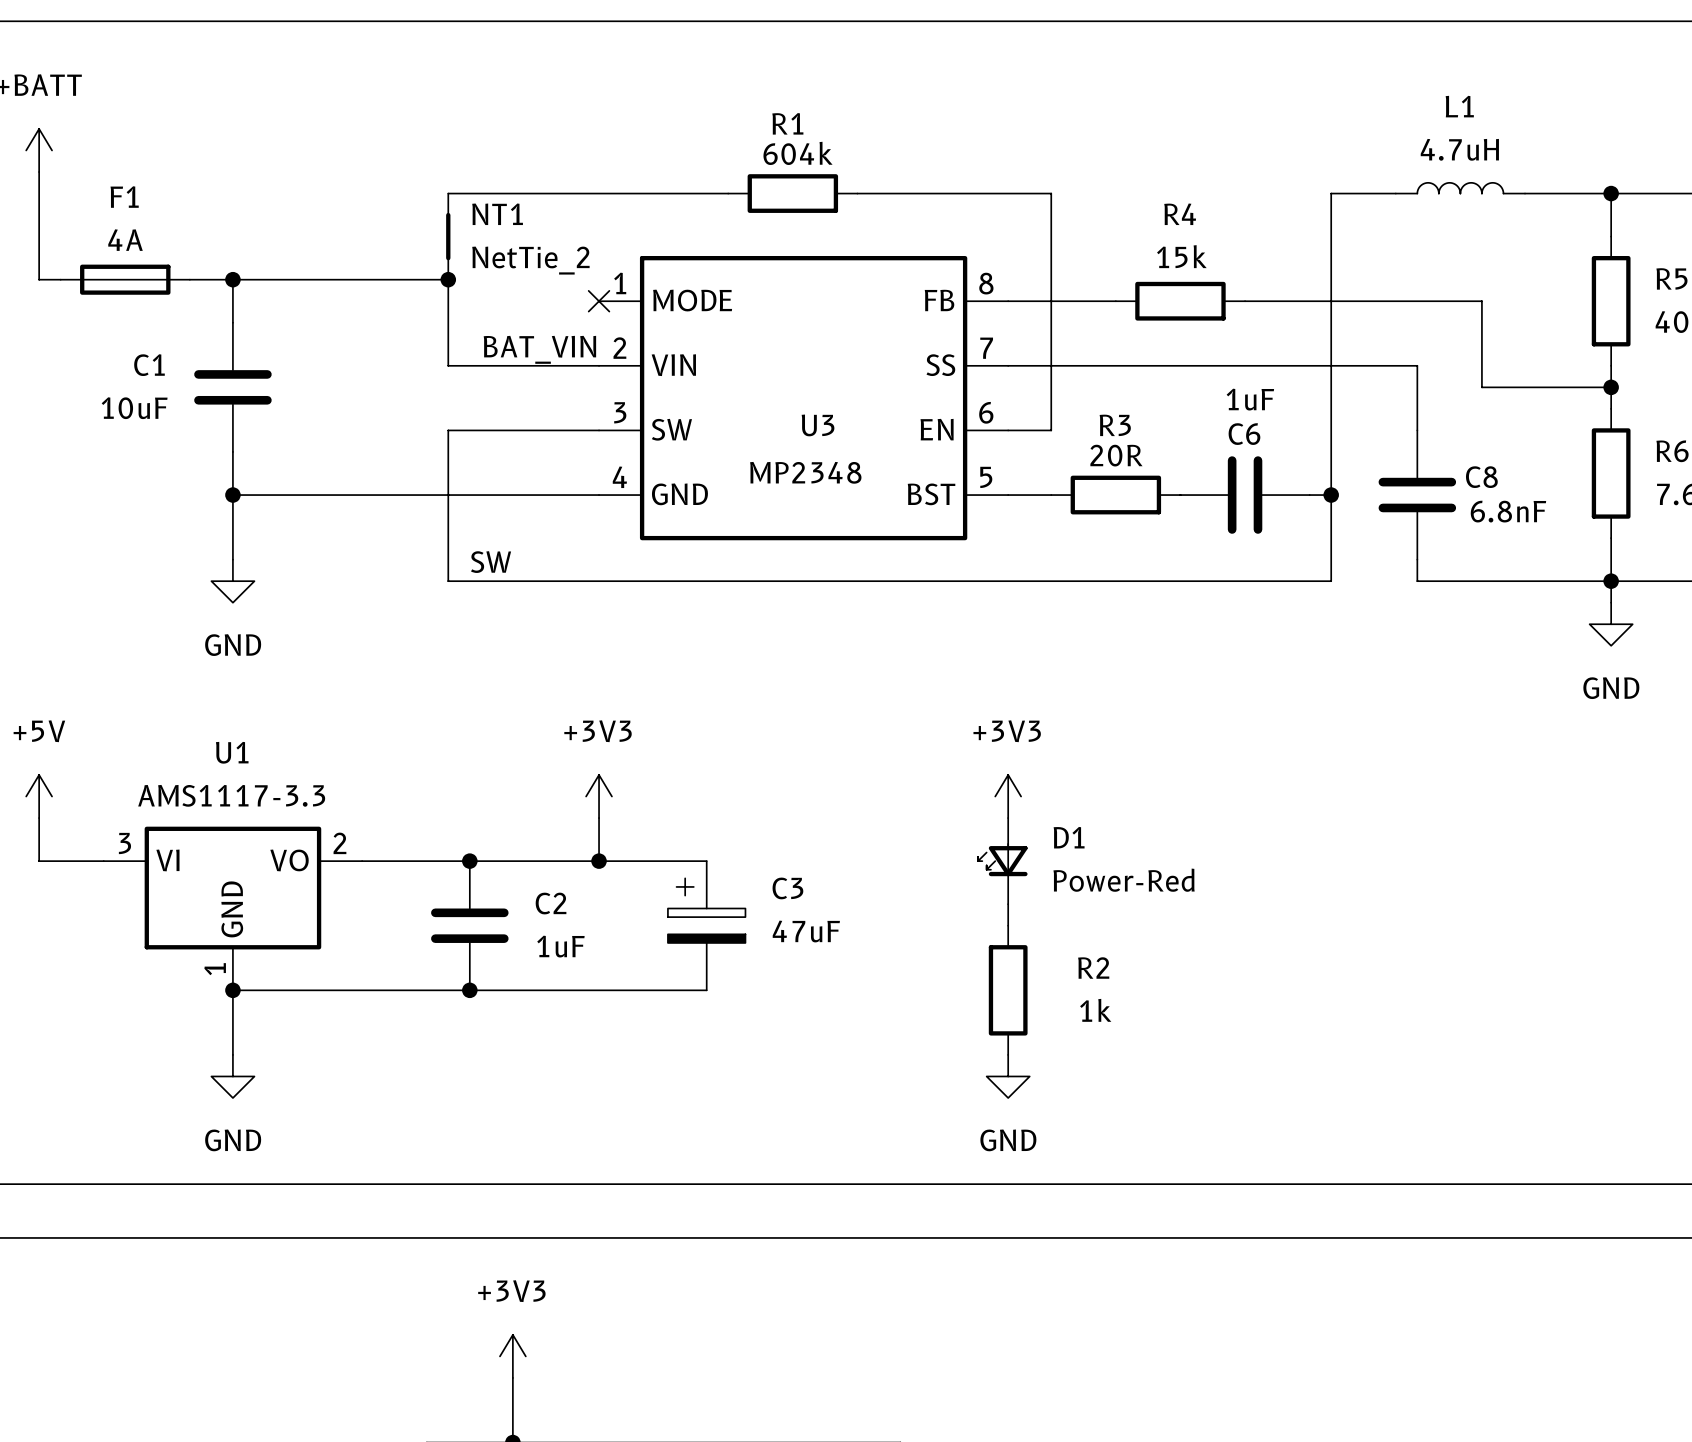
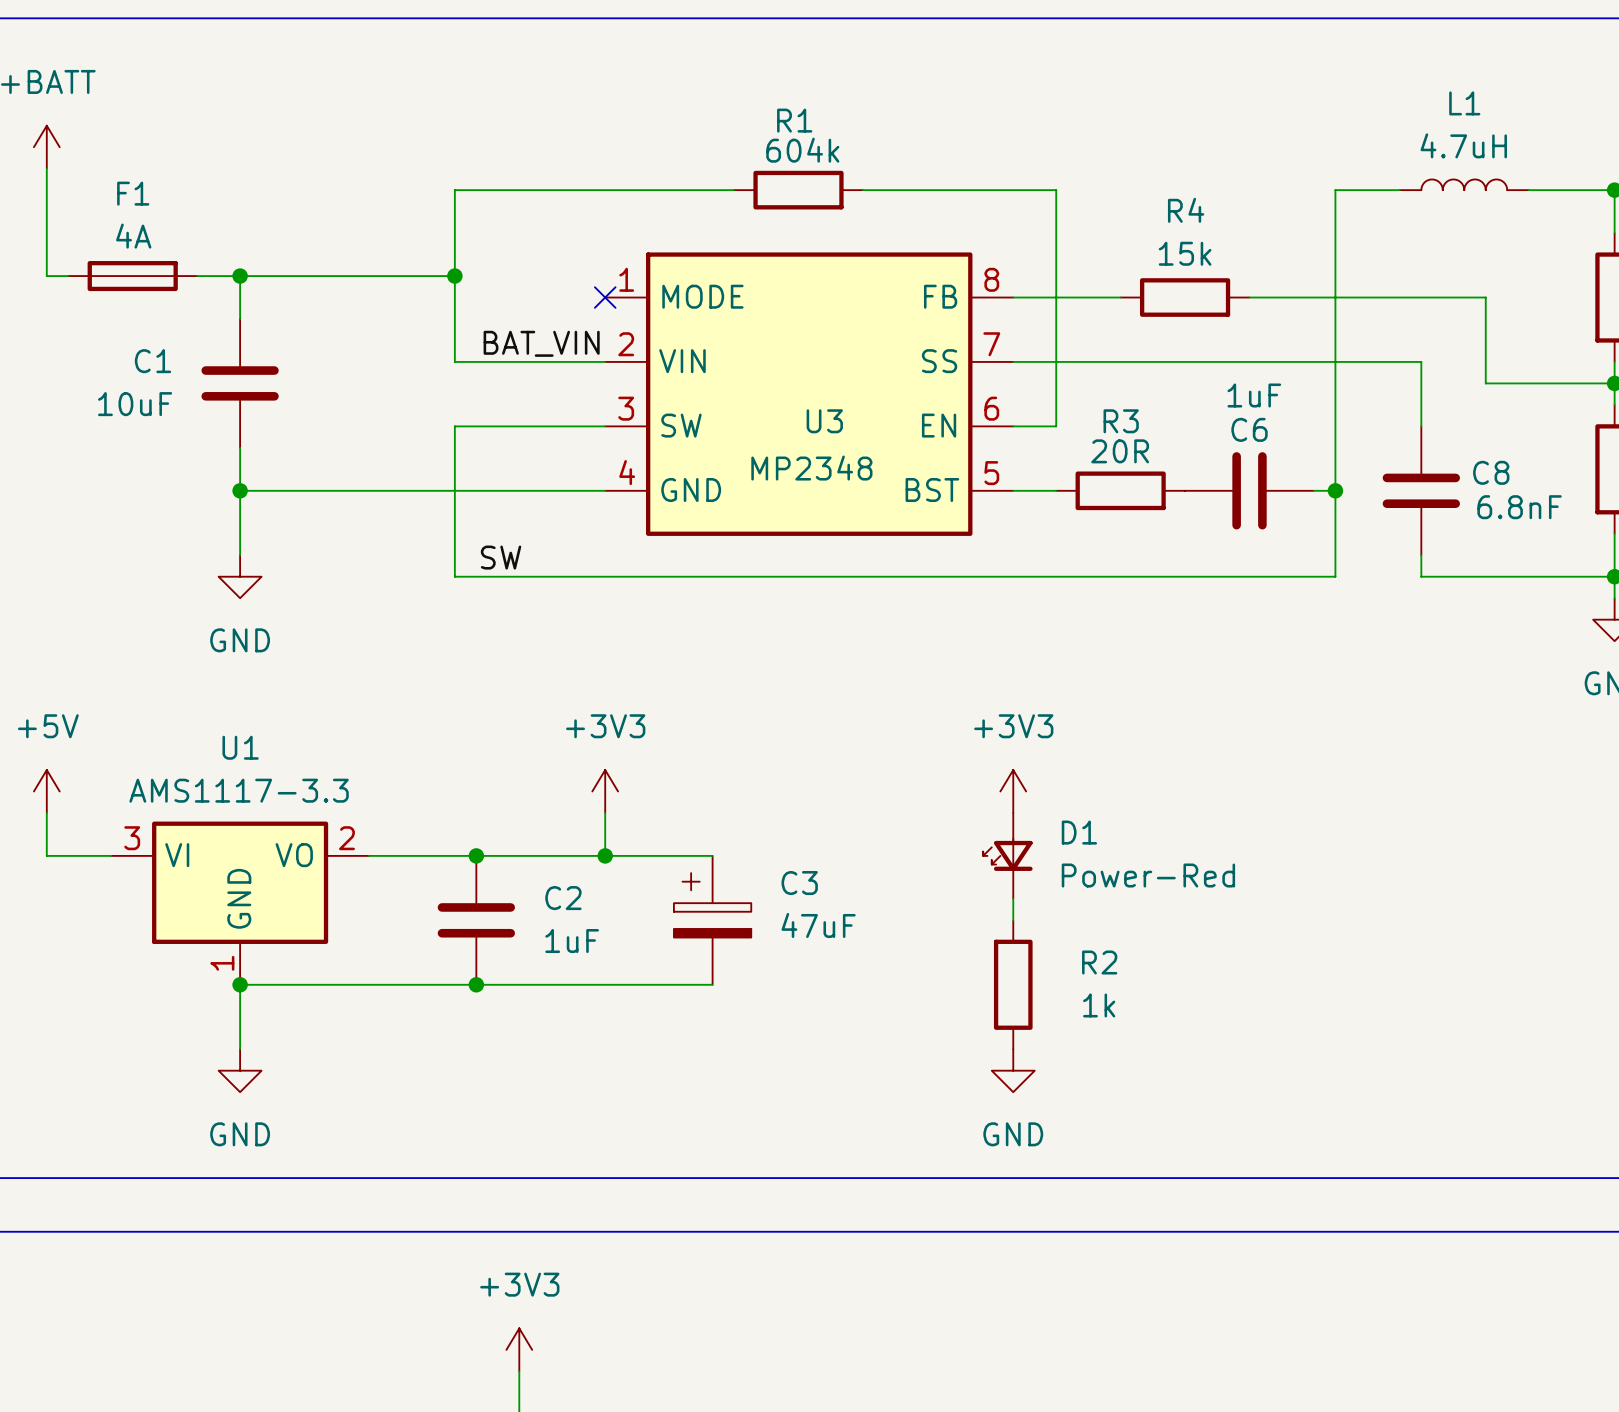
NT1: NetTie_2 (448, 236) -> none

